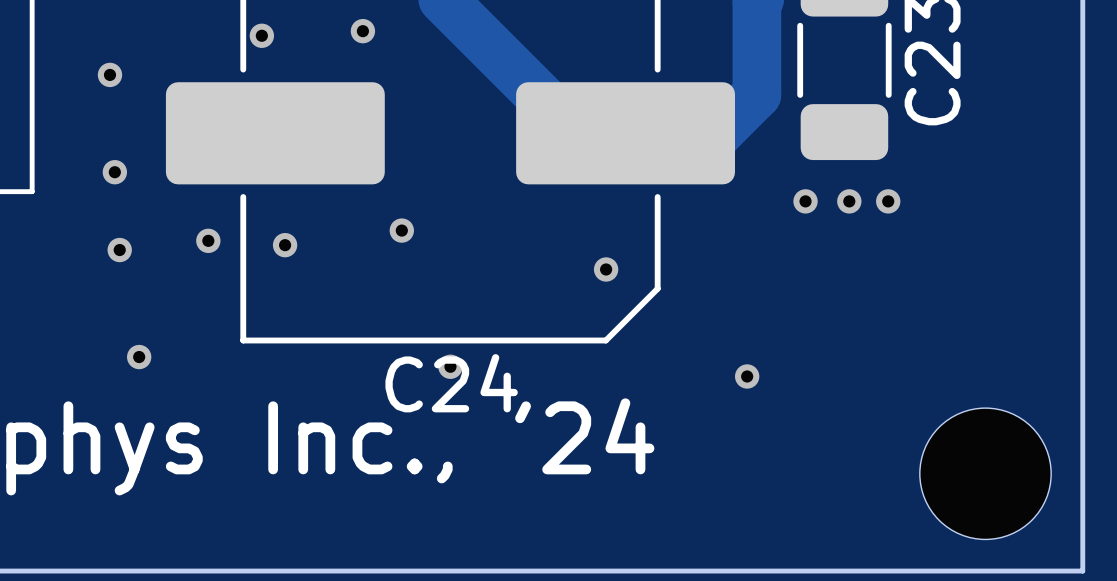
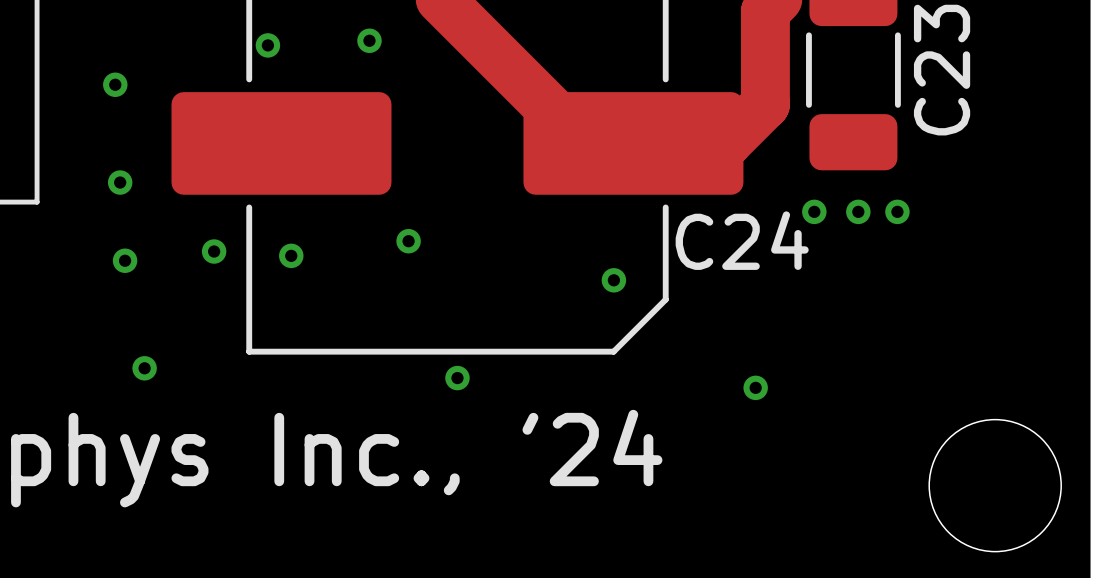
C24 name position: C24 (451, 383) -> C24 (742, 240)

